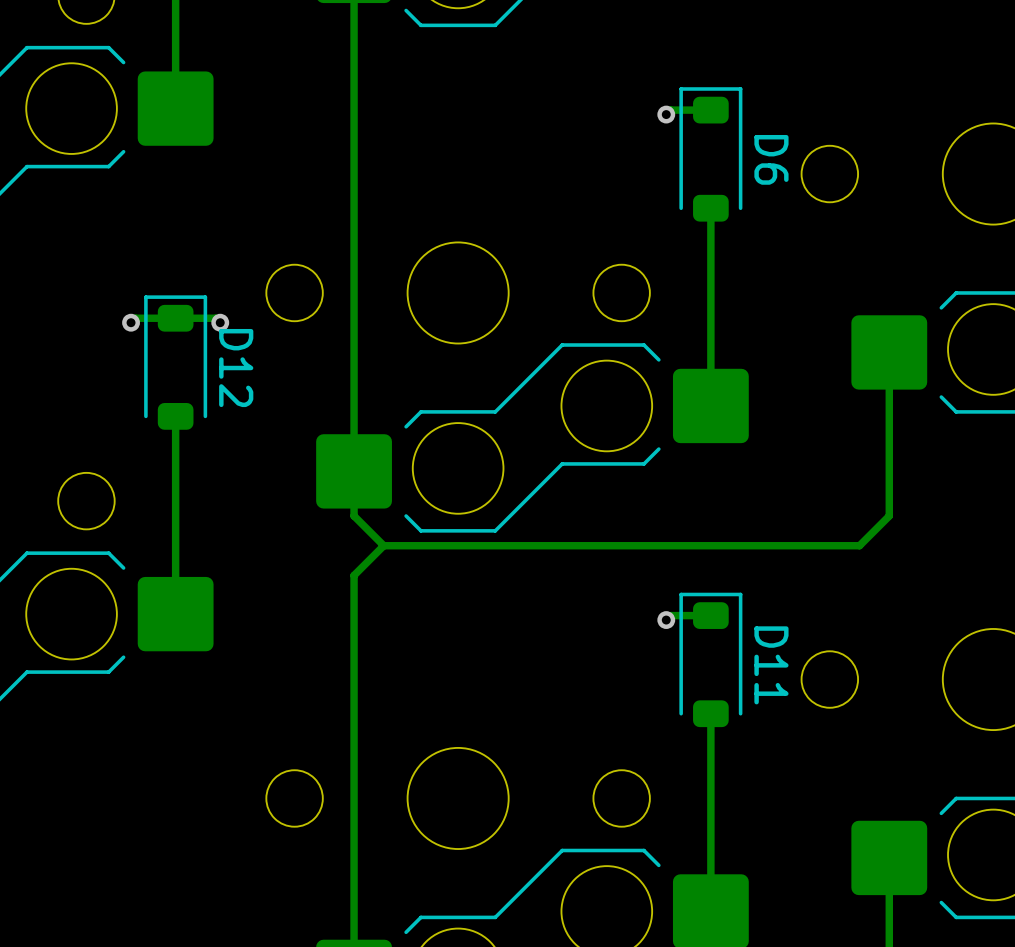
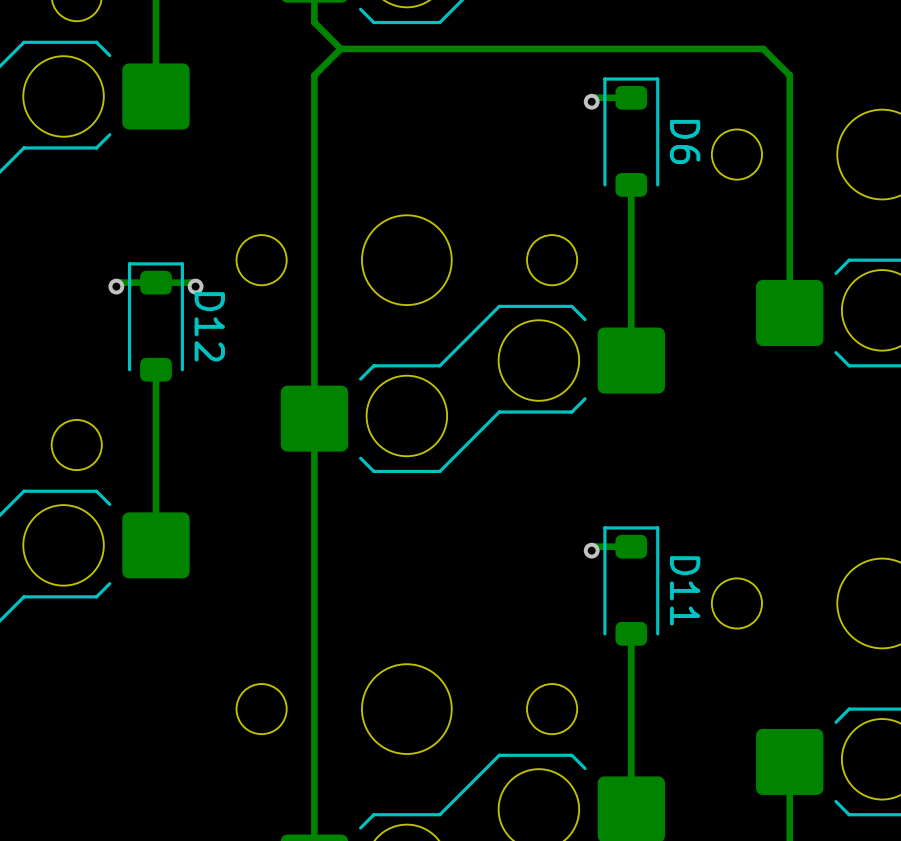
track: (354, 25) (354, 84) -> (314, 22) (340, 48)
track: none -> (340, 48) (763, 48) (789, 75) (789, 312)
track: (886, 349) (889, 352) (889, 515) (859, 545) (383, 545) -> none
track: (354, 515) (383, 545) -> (314, 458) (314, 511)
track: (383, 545) (354, 575) -> (340, 48) (314, 75)

